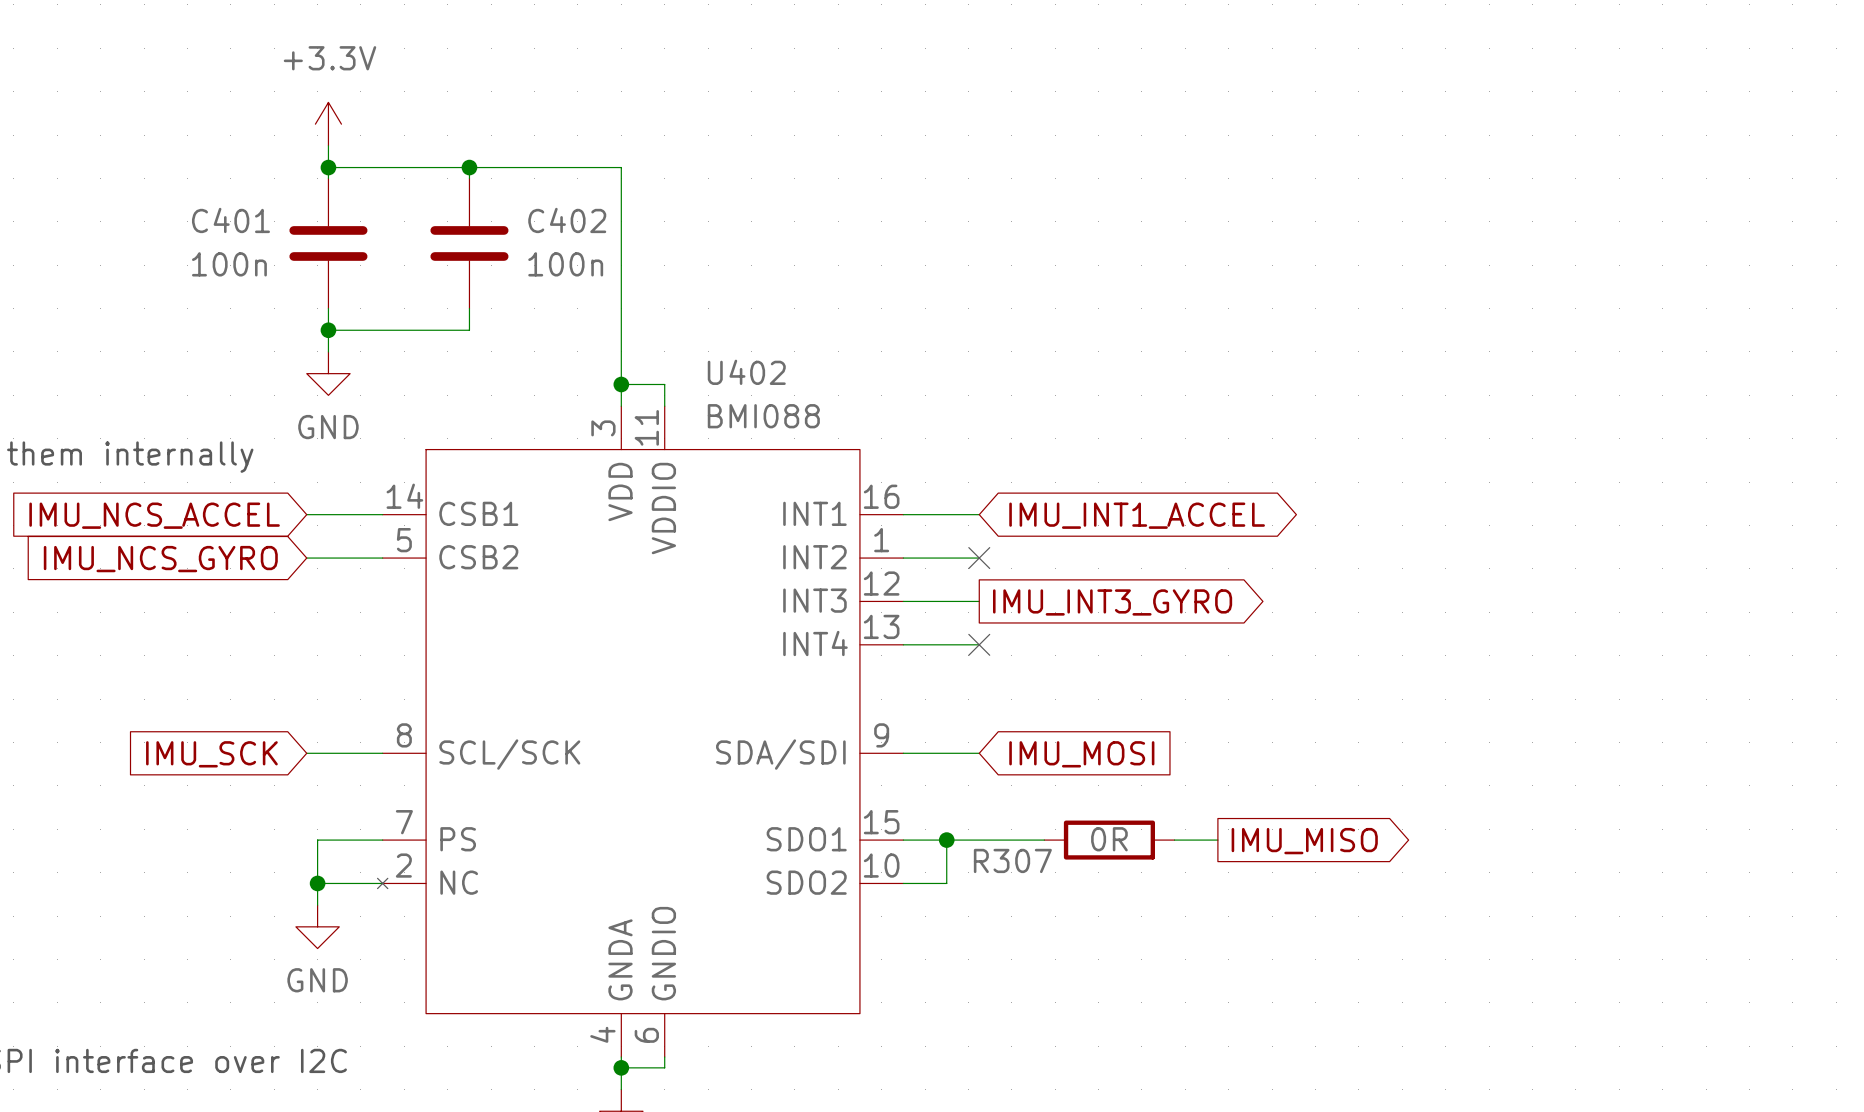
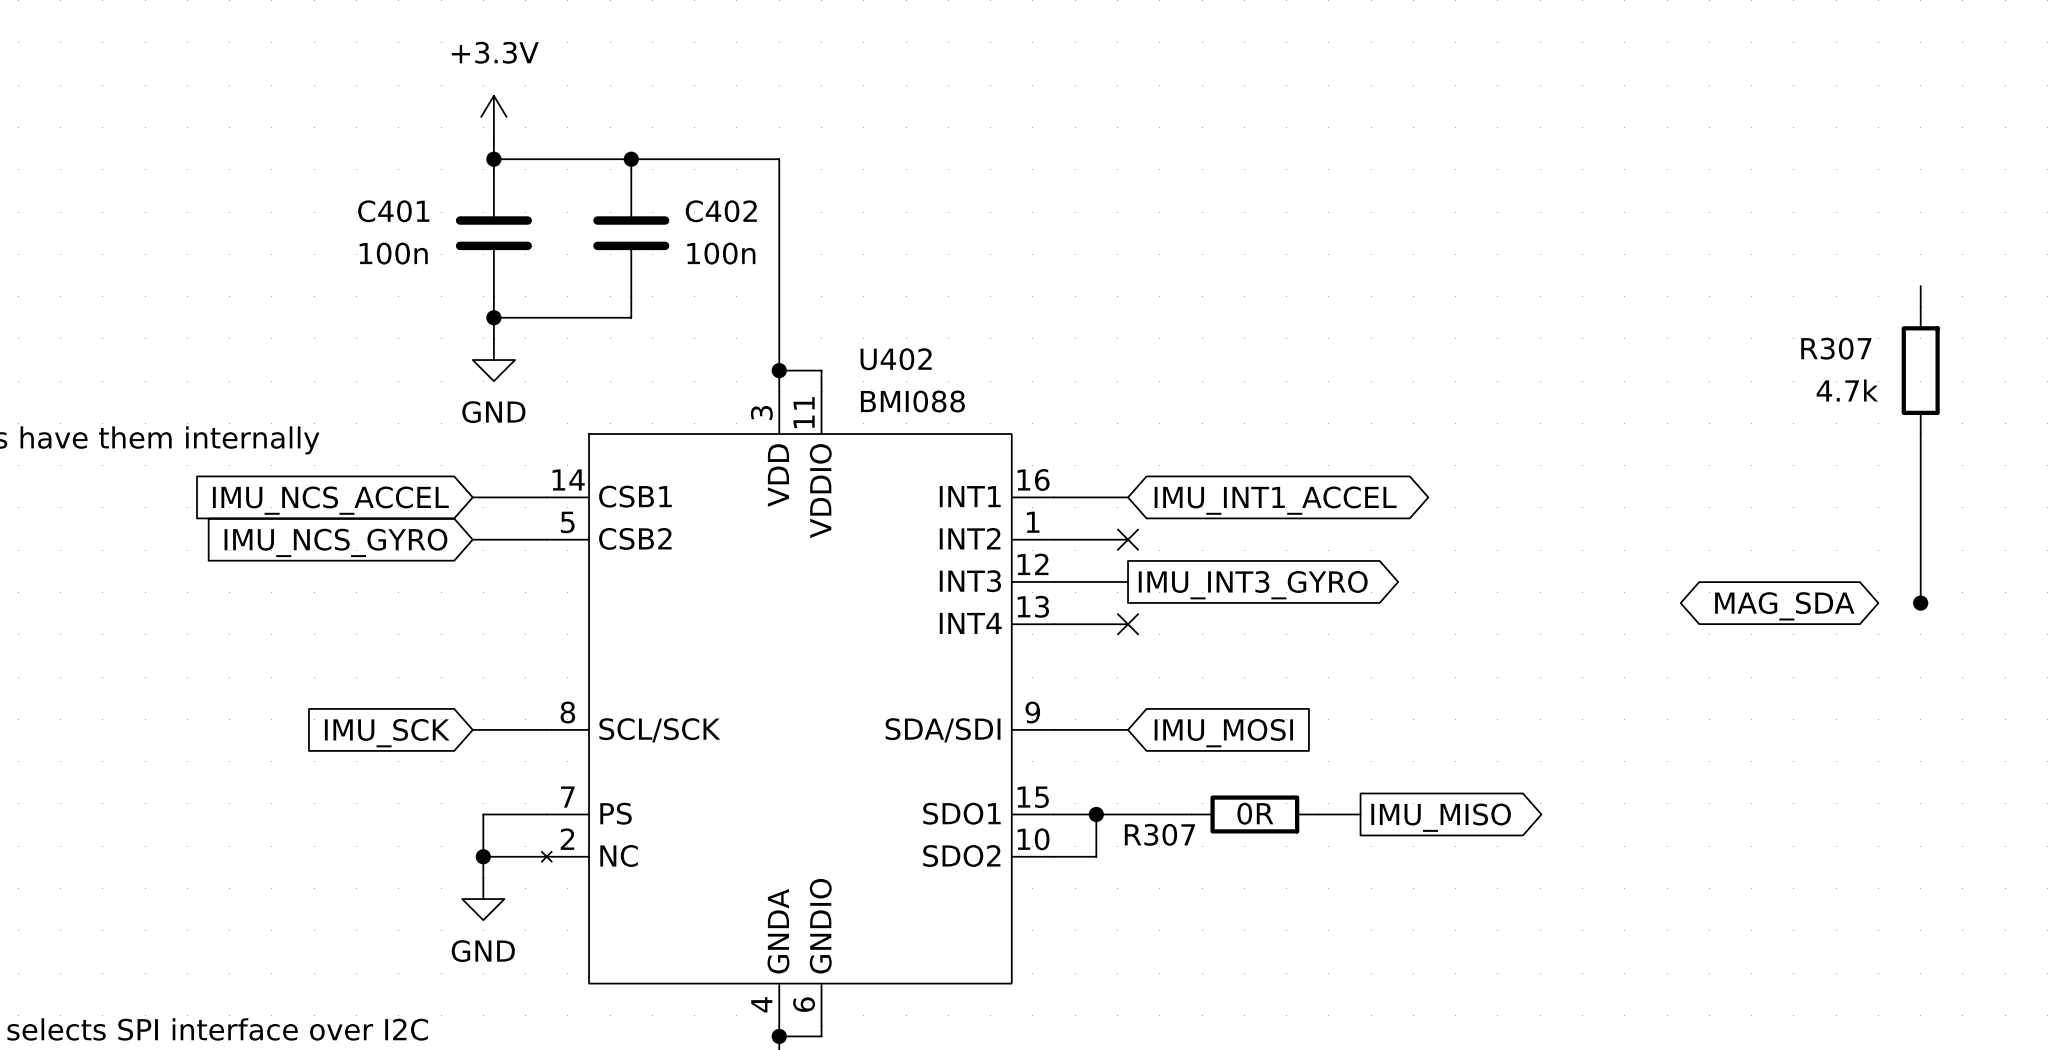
wire: none -> (1920, 286) (1920, 307)
R307: none -> 4.7k (1920, 370)
wire: none -> (1920, 434) (1920, 603)
junction: none -> (1920, 603)
global label: none -> MAG_SDA (1784, 606)

